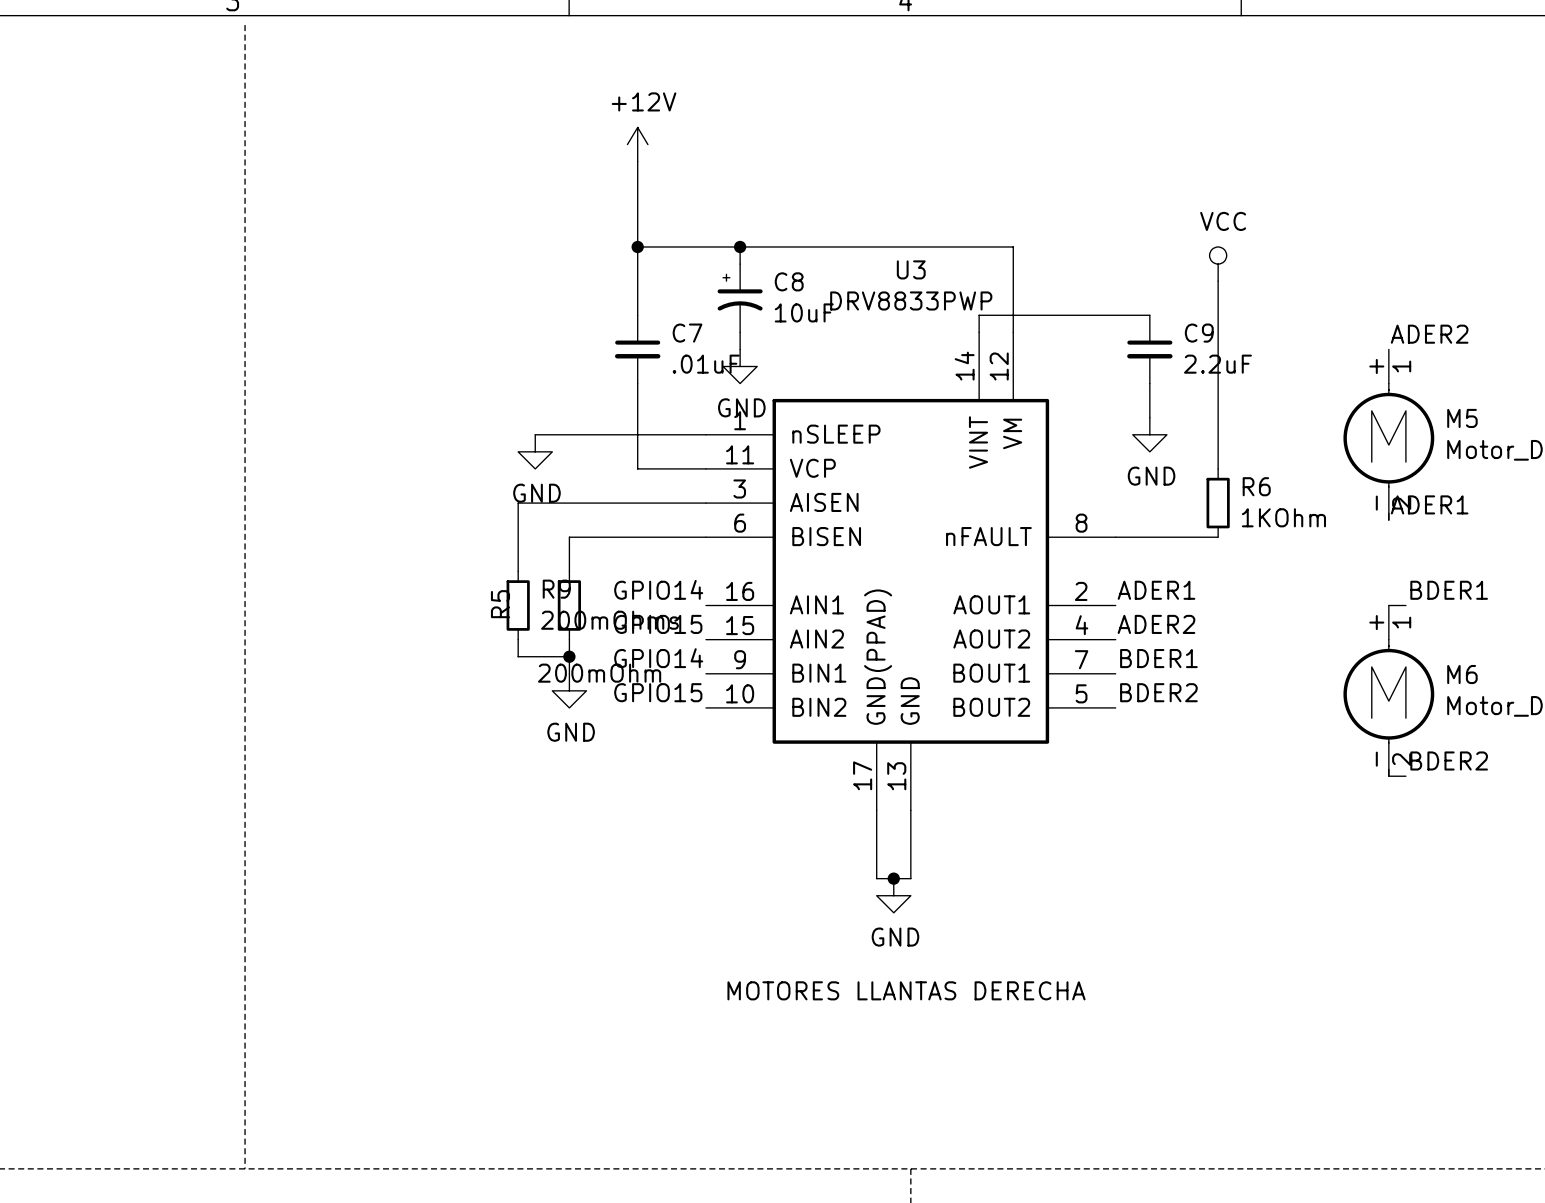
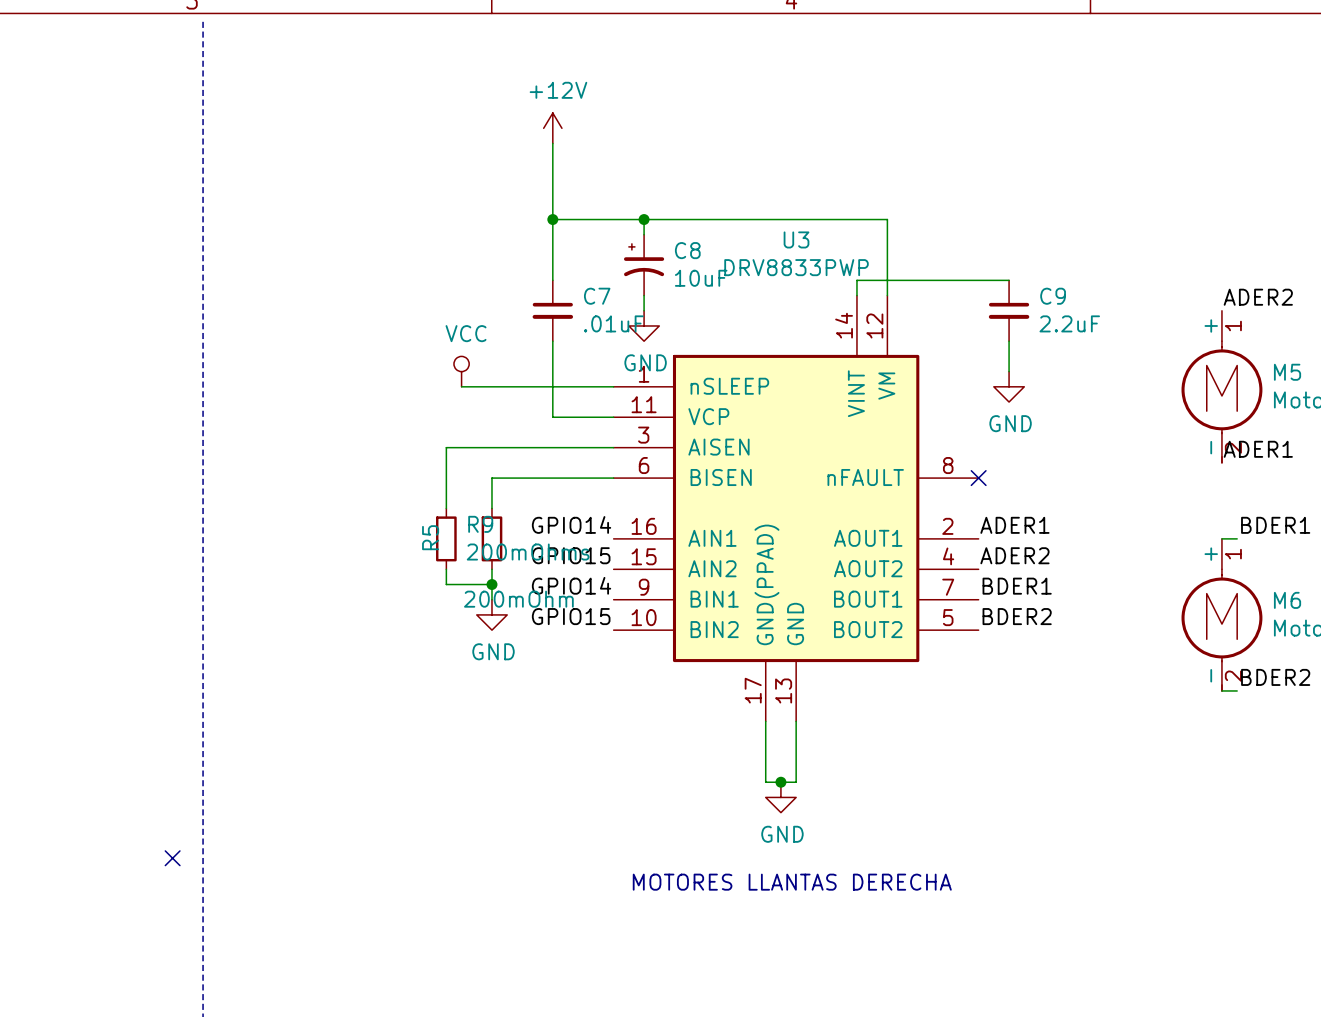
power symbol: VCC (1218, 264) -> none
wire: (1218, 281) (1218, 468) -> none
power symbol: none -> VCC (461, 371)
power symbol: GND (535, 451) -> none
R6: 1KOhm (1218, 503) -> none
wire: (1115, 537) (1218, 537) -> none
no-connect mark: none -> (978, 478)
no-connect mark: none -> (172, 858)

